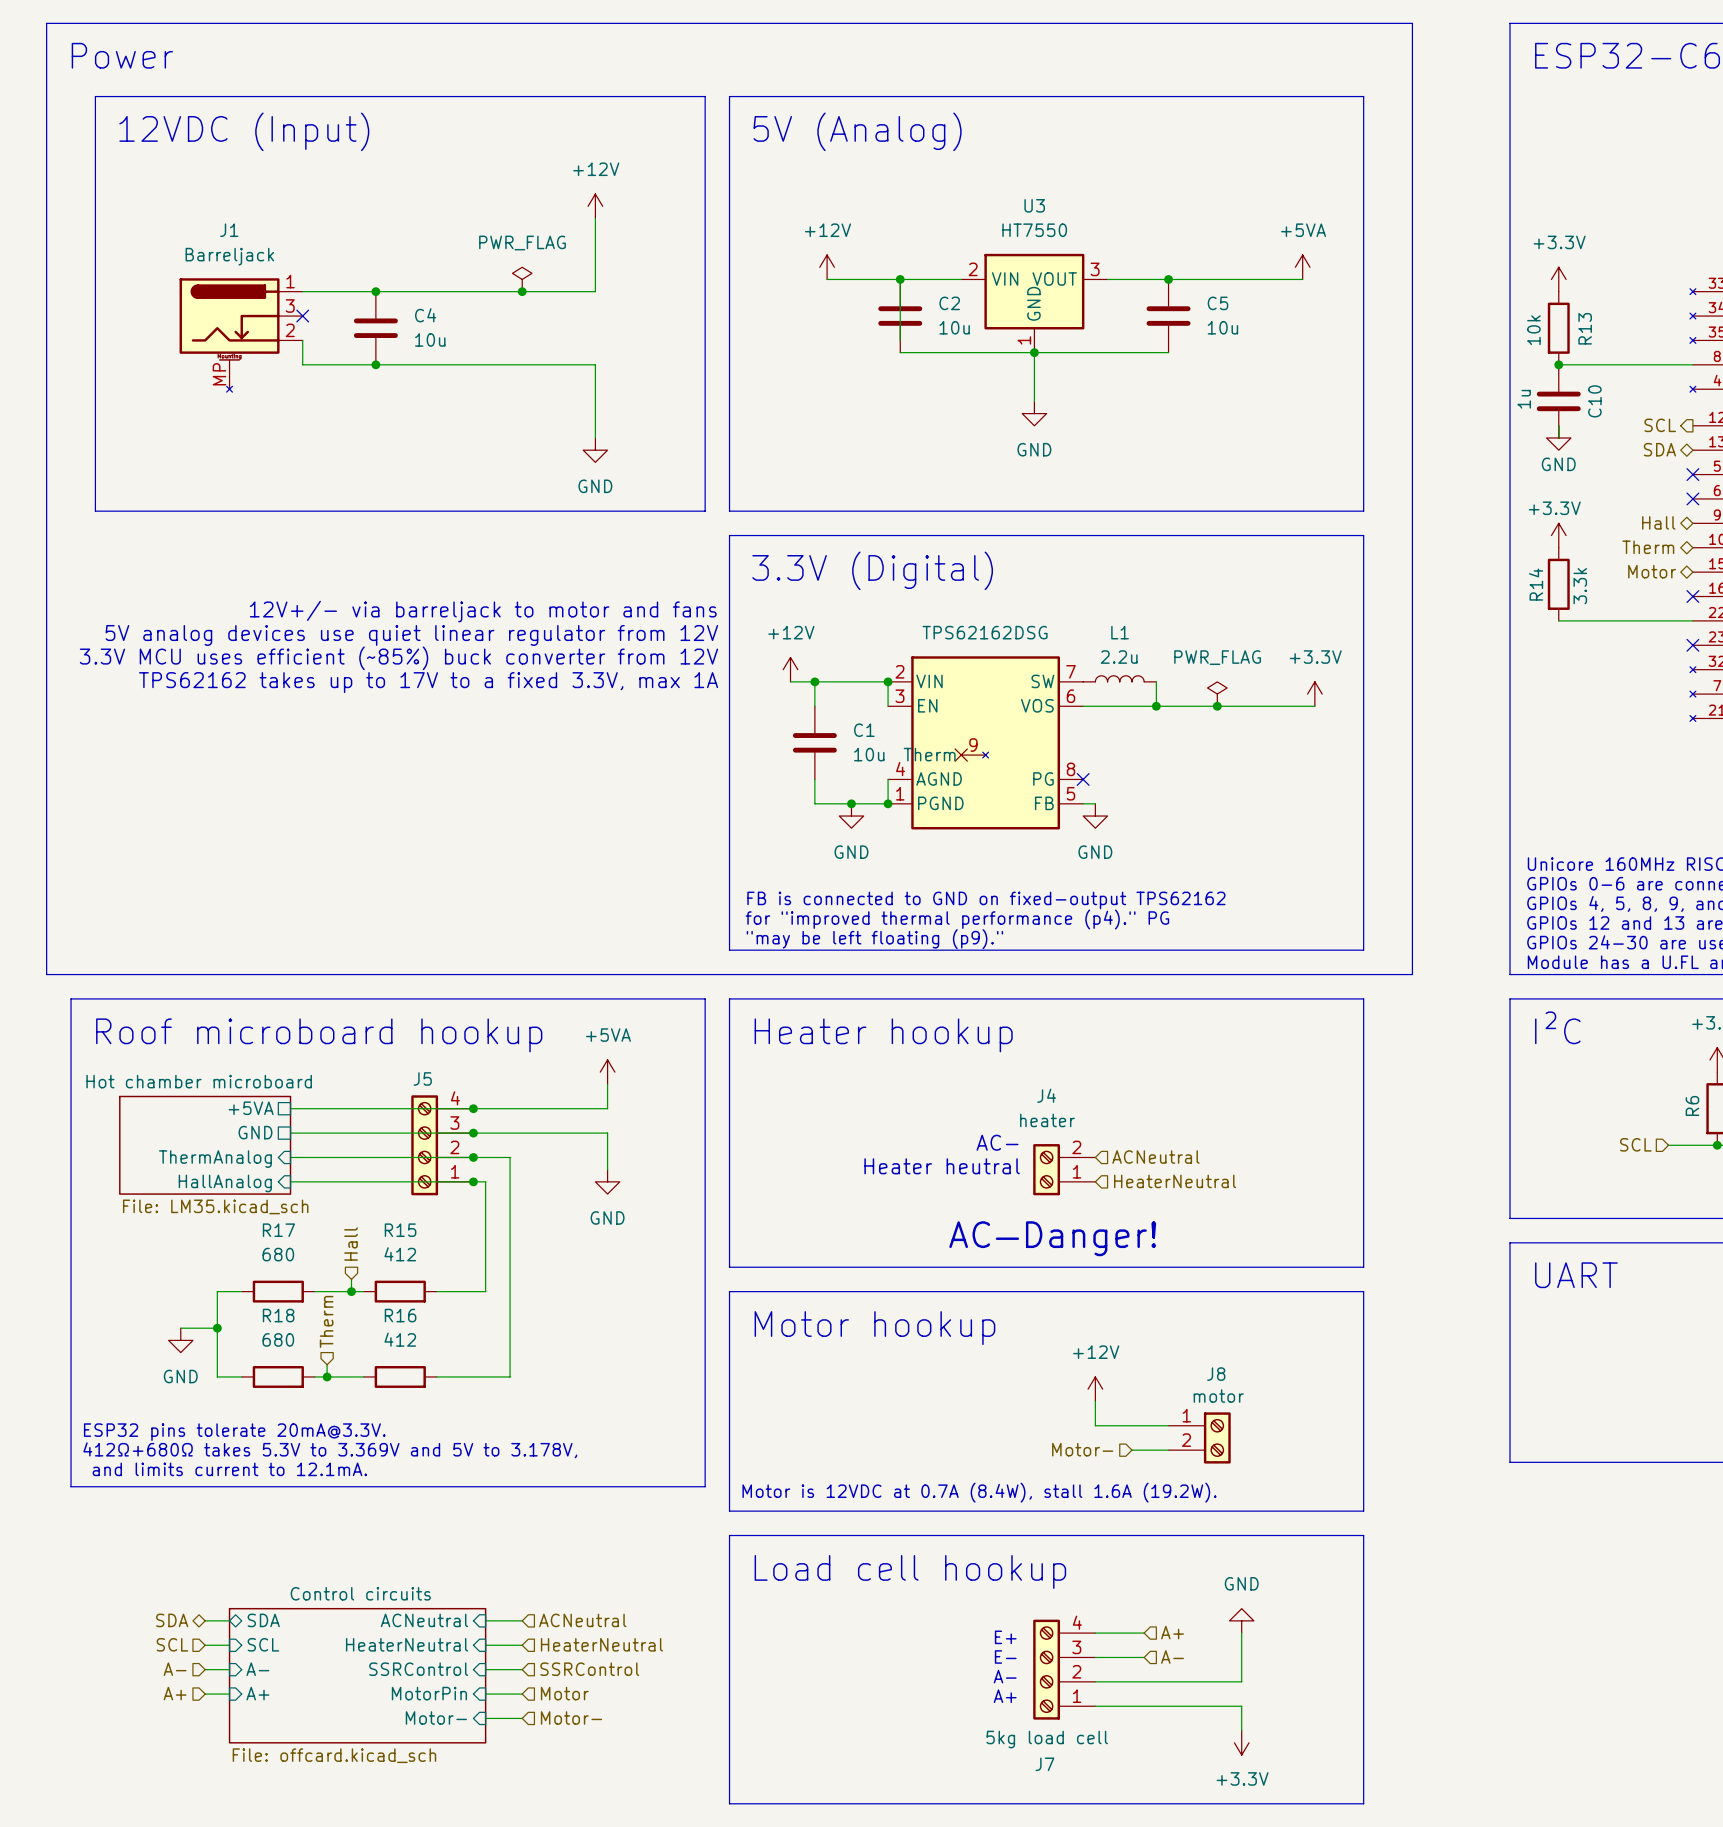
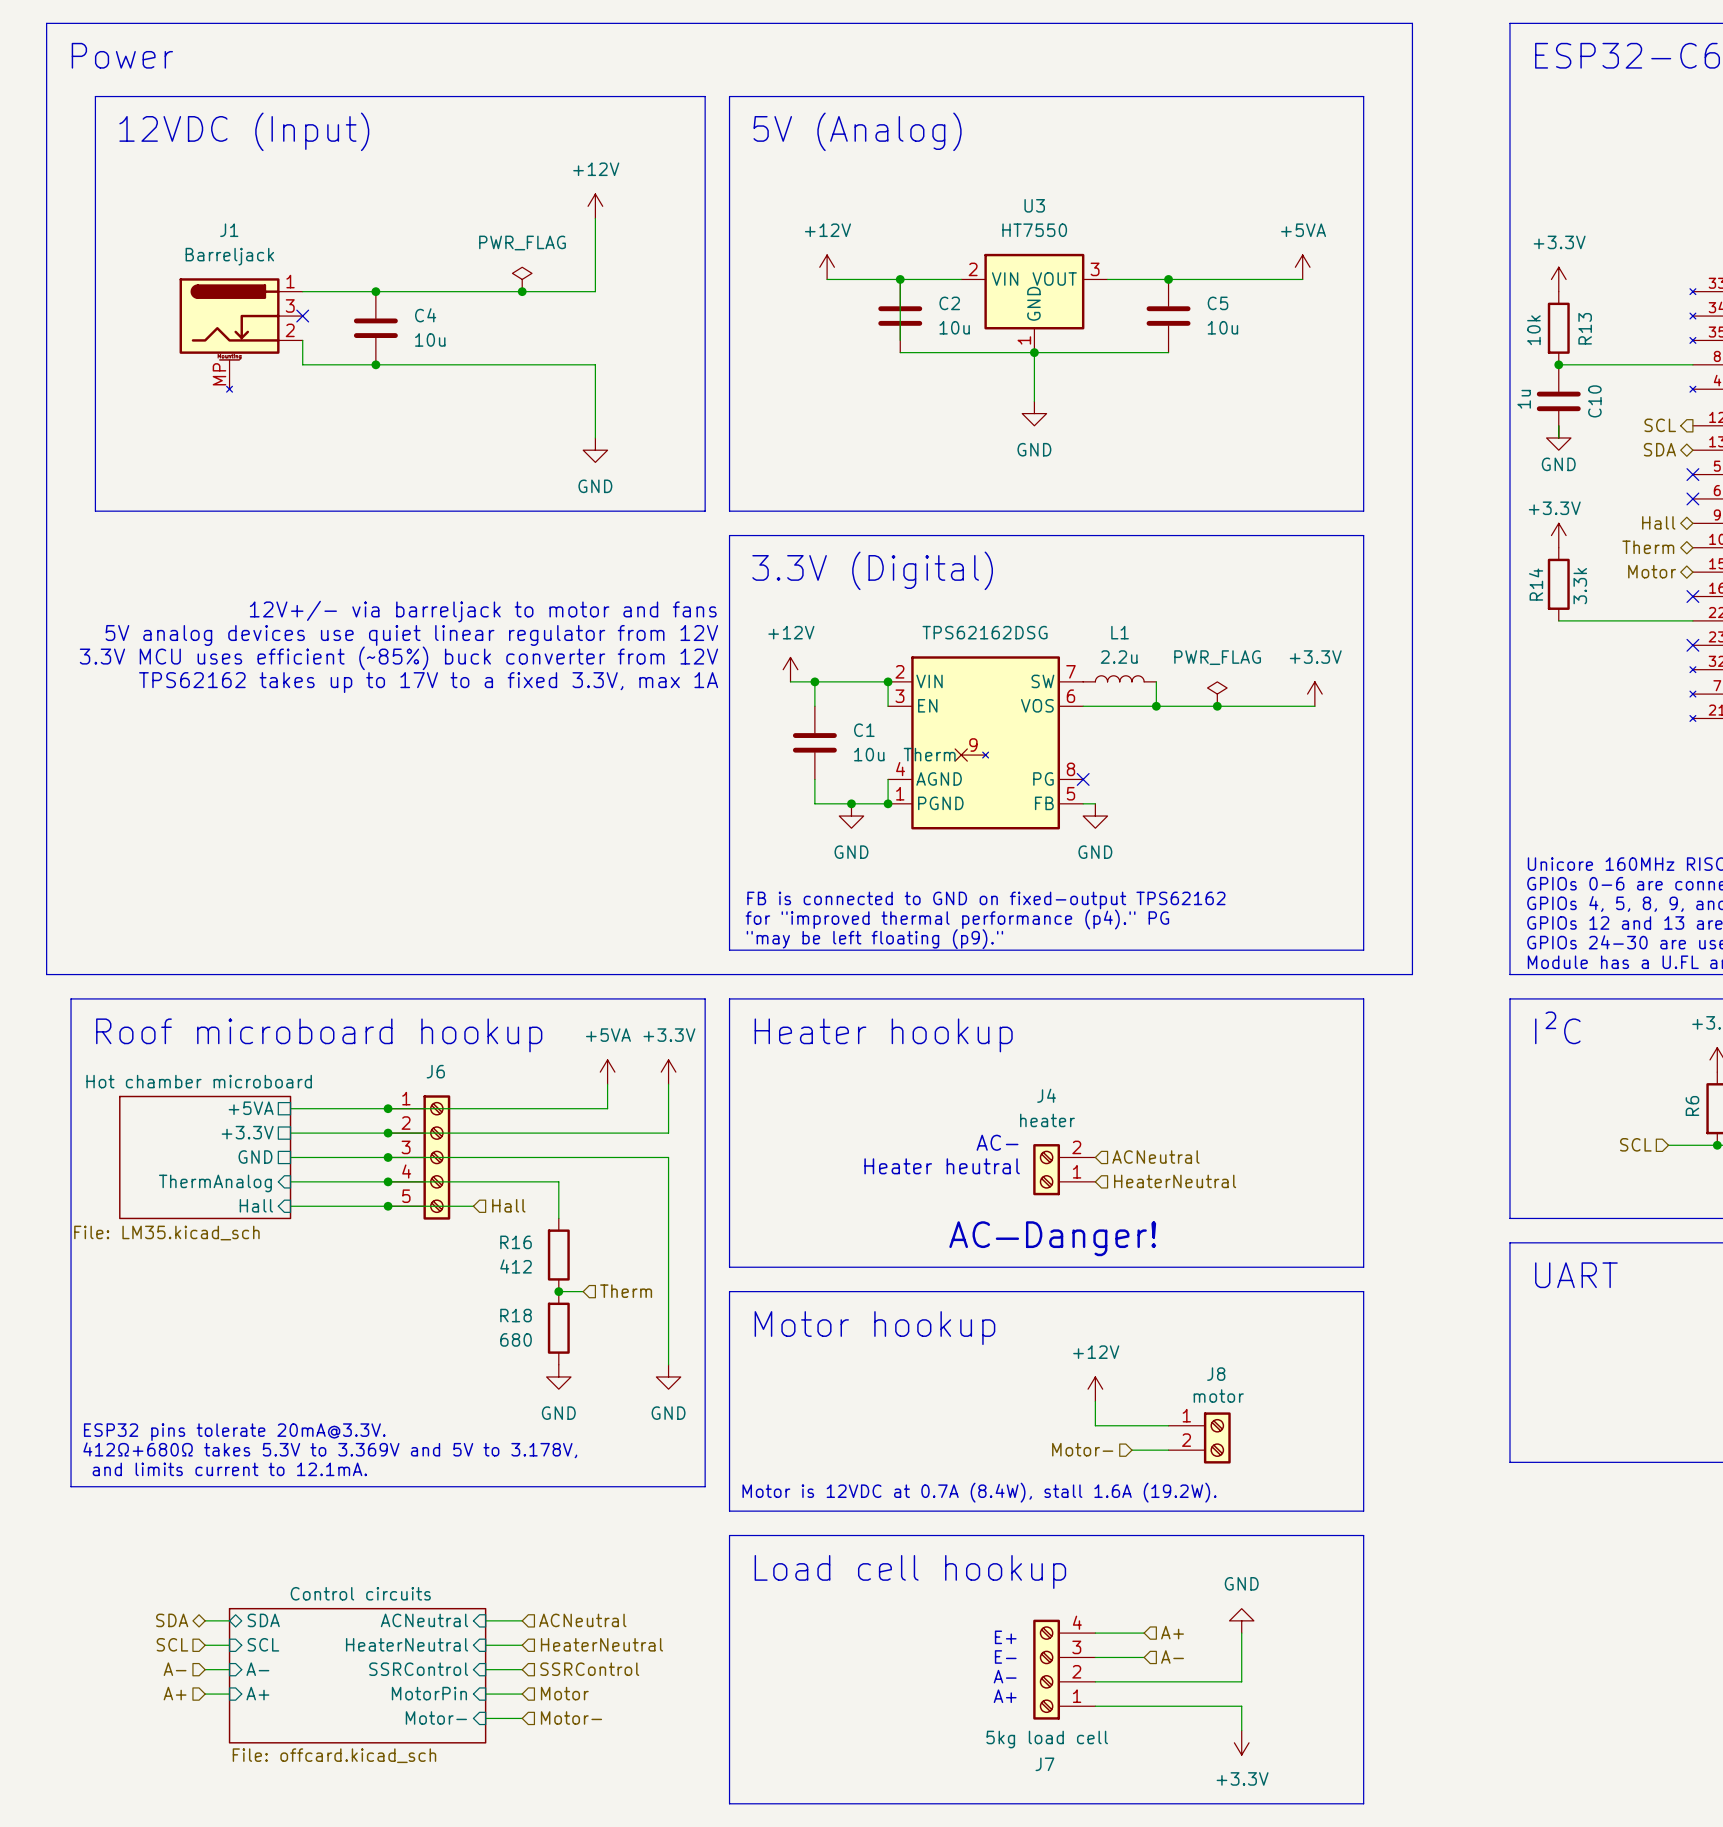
power symbol: none -> +3.3V (668, 1072)
junction: none -> (388, 1108)
junction: (473, 1108) -> none
sheet pin: GND (255, 1132) -> +3.3V (247, 1132)
junction: none -> (388, 1133)
junction: (473, 1133) -> none
wire: (607, 1133) (607, 1169) -> (607, 1133) (668, 1133) (668, 1084)
sheet Hot chamber microboard: File: LM35.kicad_sch (205, 1145) -> none
J5: (442, 1145) -> none
sheet Hot chamber microboard: none -> File: LM35.kicad_sch (205, 1157)
junction: none -> (388, 1157)
J6: none -> (419, 1157)
junction: (473, 1157) -> none
wire: (510, 1157) (510, 1376) (436, 1376) -> (510, 1157) (668, 1157) (668, 1364)
sheet pin shape: input (215, 1159) -> passive (255, 1157)
sheet pin: ThermAnalog (215, 1159) -> GND (255, 1157)
junction: none -> (388, 1181)
junction: (473, 1181) -> none
wire: (485, 1181) (485, 1291) (436, 1291) -> (485, 1181) (558, 1181) (558, 1218)
power symbol: GND (607, 1181) -> none
sheet pin: HallAnalog (225, 1183) -> ThermAnalog (215, 1183)
sheet pin: none -> Hall (256, 1205)
wire: none -> (290, 1206) (473, 1206)
junction: none -> (388, 1206)
hierarchical label rotation: 0° (351, 1244) -> 90° clockwise (508, 1205)
hierarchical label position: Hall (351, 1244) -> Hall (508, 1205)
wire: (351, 1279) (351, 1291) -> none
wire: (241, 1291) (217, 1291) (217, 1376) (241, 1376) -> none
R17: 680 (278, 1291) -> none
wire: (314, 1291) (363, 1291) -> none
junction: (351, 1291) -> none
R15: 412 (400, 1291) -> none
wire: none -> (558, 1291) (583, 1291)
junction: none -> (558, 1291)
hierarchical label: none -> Therm (626, 1291)
R18 name position: R18 (278, 1315) -> R18 (516, 1315)
R16 name position: R16 (400, 1315) -> R16 (516, 1242)
hierarchical label: Therm (326, 1321) -> none
wire: (180, 1328) (217, 1328) -> none
junction: (217, 1328) -> none
R18 value position: 680 (278, 1339) -> 680 (516, 1339)
R16 value position: 412 (400, 1339) -> 412 (516, 1266)
power symbol: GND (180, 1340) -> none
wire: (327, 1364) (327, 1376) -> none
R18 rotation: 0° (278, 1376) -> 90° clockwise (558, 1328)
R18 position: (278, 1376) -> (558, 1328)
wire: (314, 1376) (363, 1376) -> none
junction: (327, 1376) -> none
R16 rotation: 0° (400, 1376) -> 90° clockwise (558, 1255)
R16 position: (400, 1376) -> (558, 1255)
power symbol: none -> GND (558, 1376)
power symbol: none -> GND (668, 1376)

